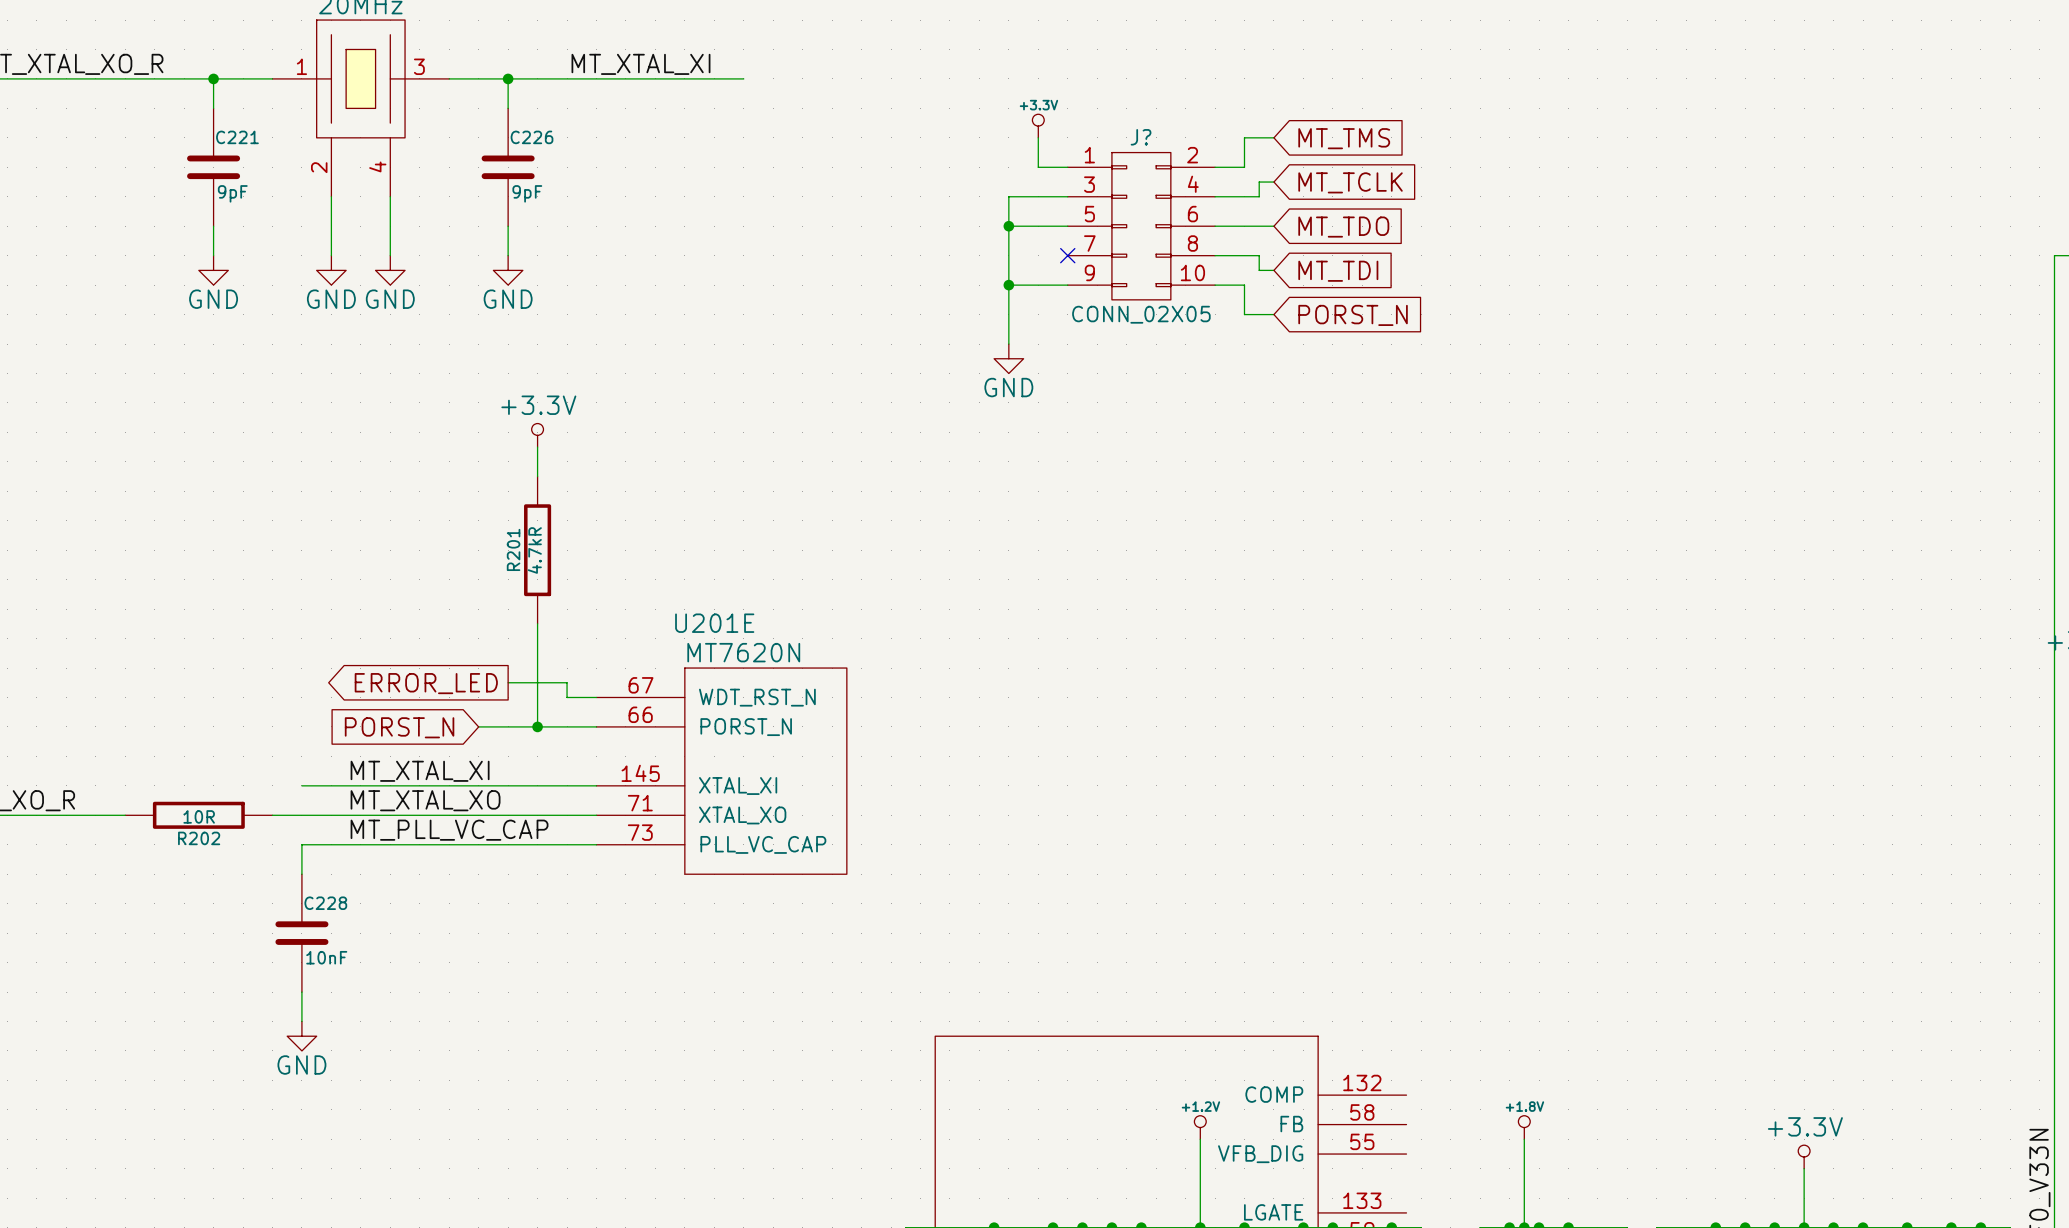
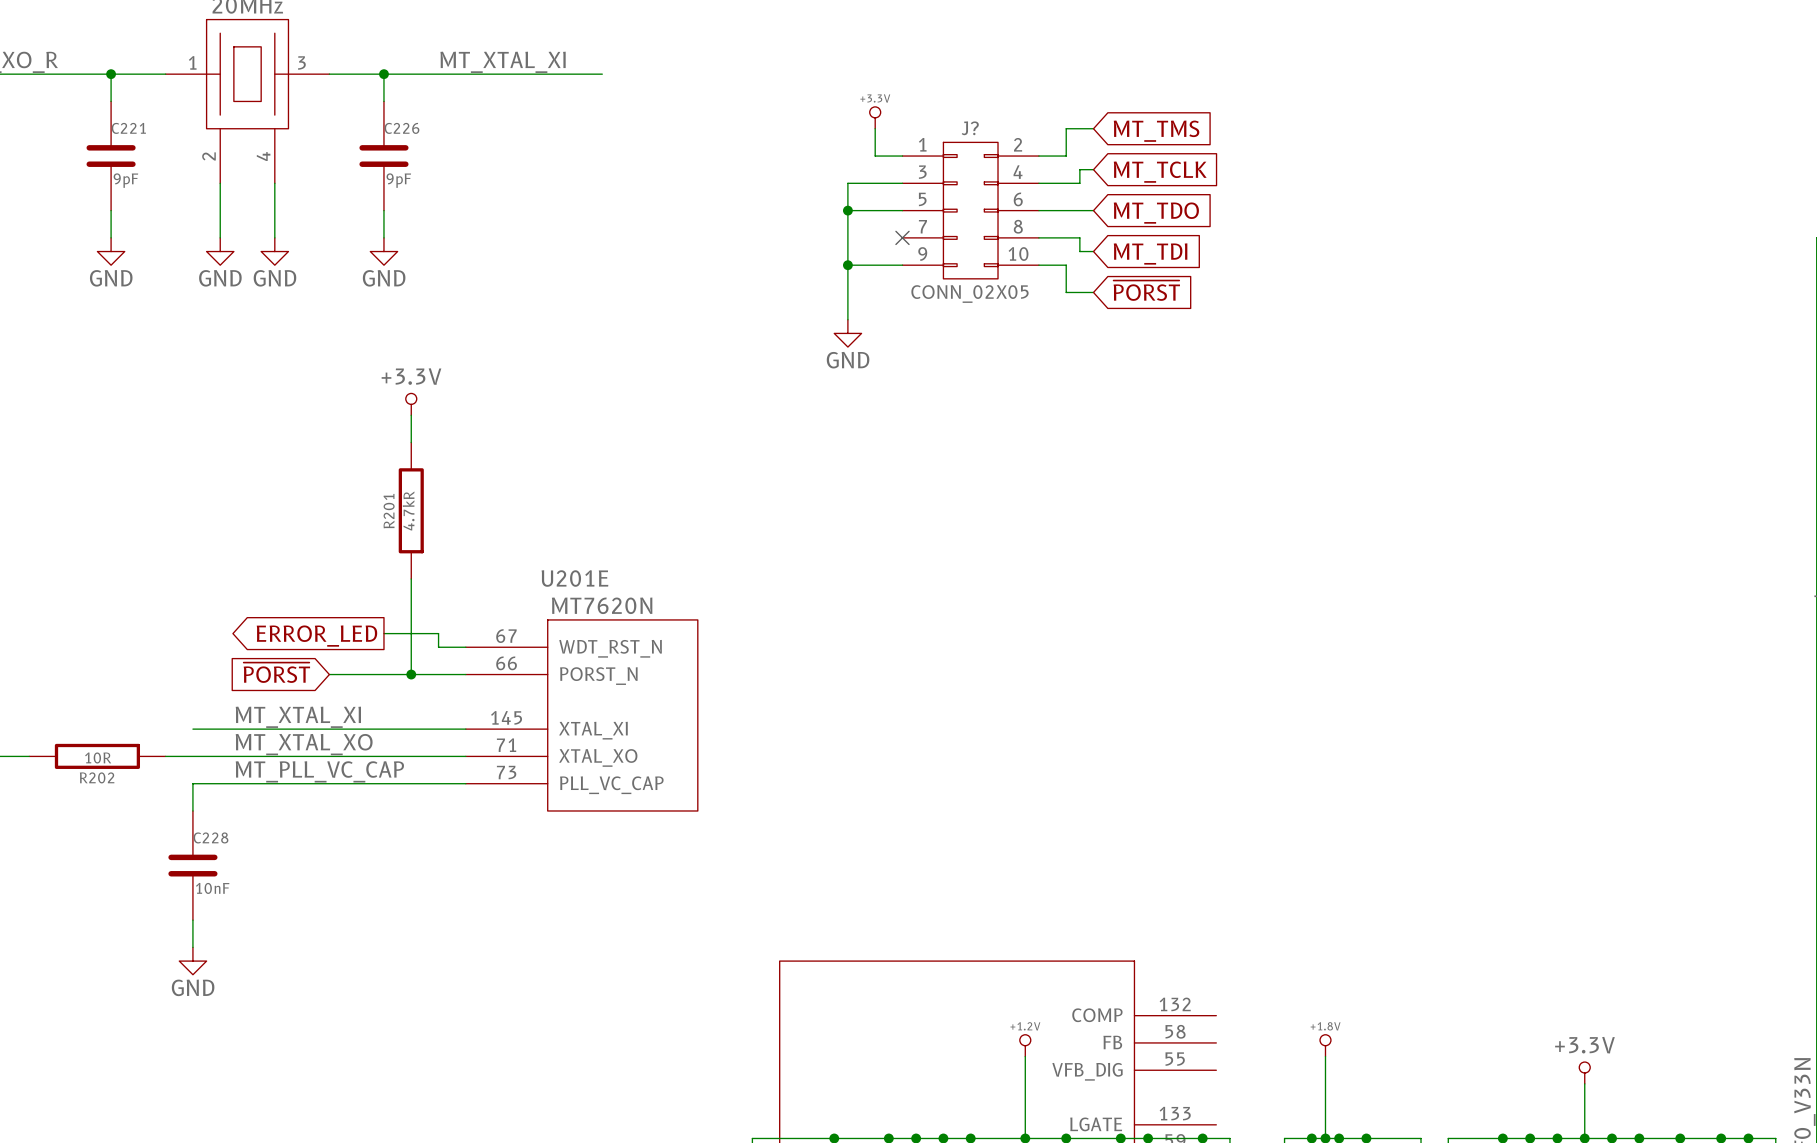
global label: PORST_N (1353, 315) -> ~{PORST} (1146, 290)
wire: none -> (329, 674) (356, 674)
global label: PORST_N (399, 727) -> ~{PORST} (276, 672)

